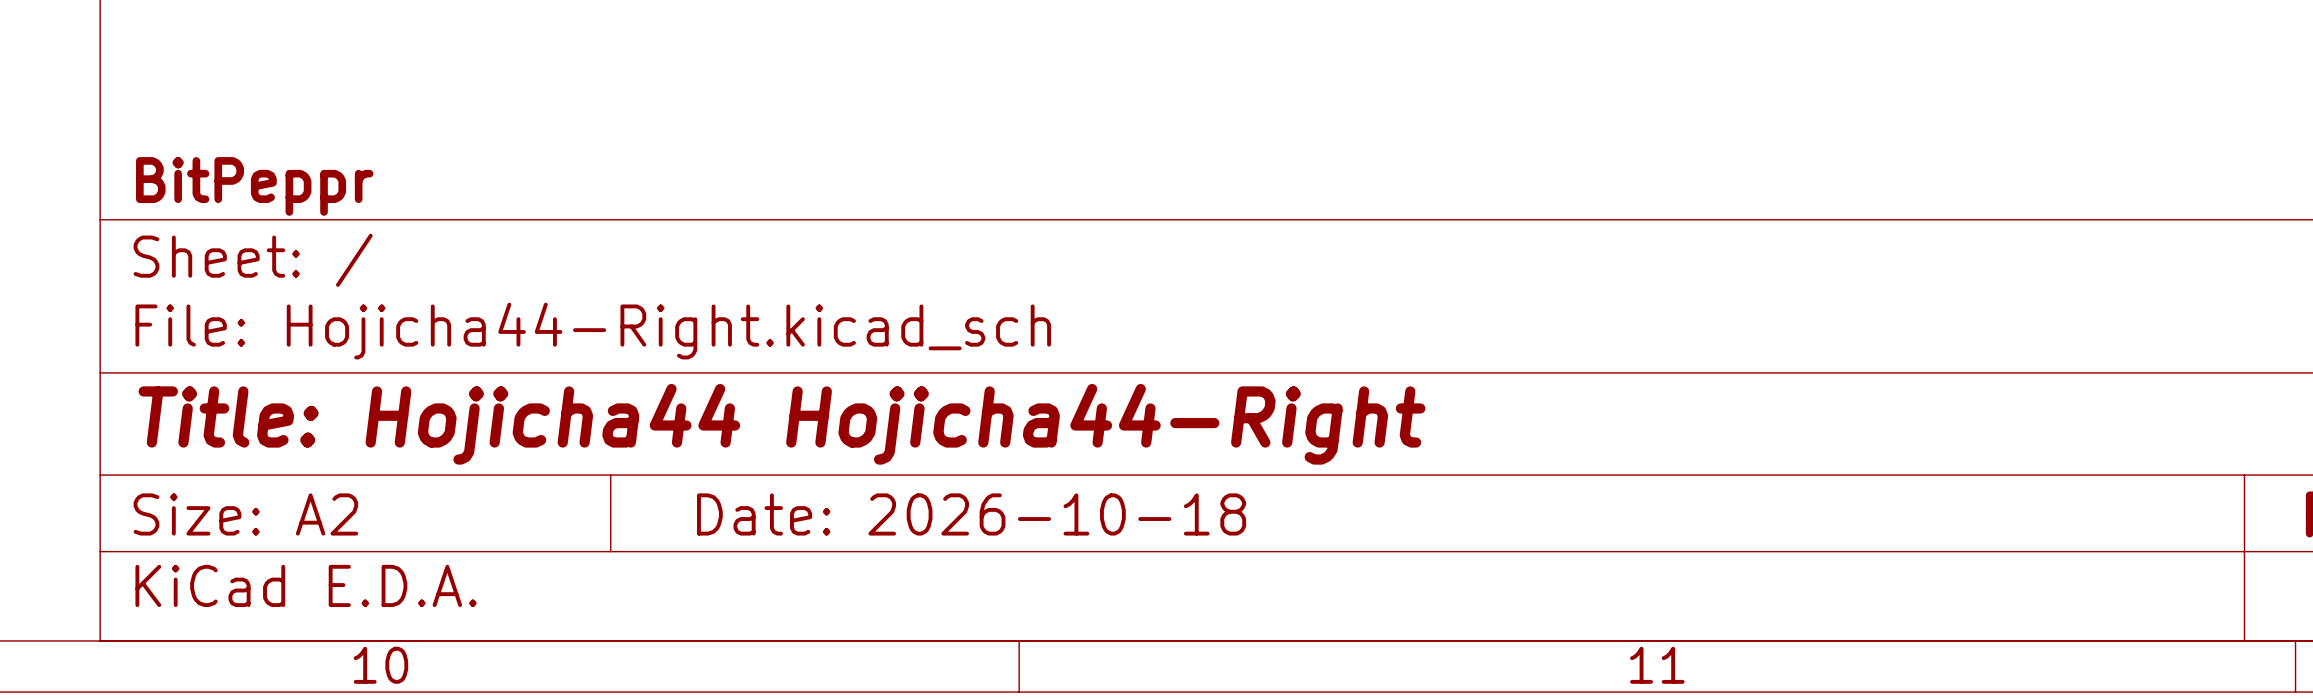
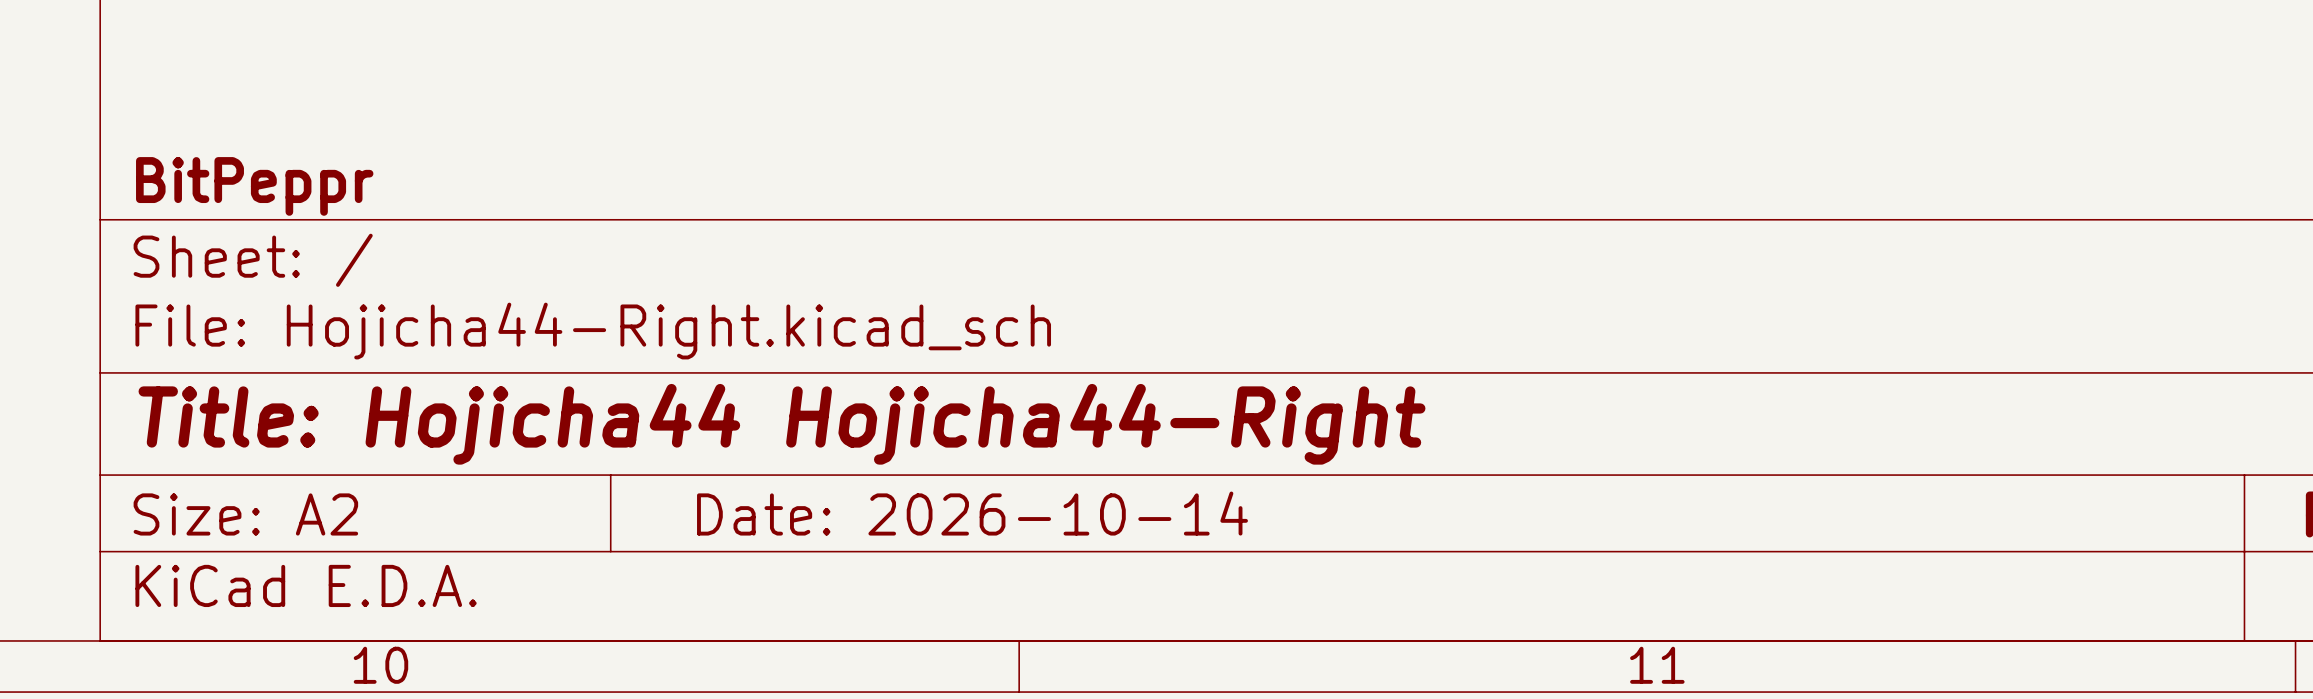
title block: Date: 2026-10-18 (971, 514) -> Date: 2026-10-14 (972, 513)

